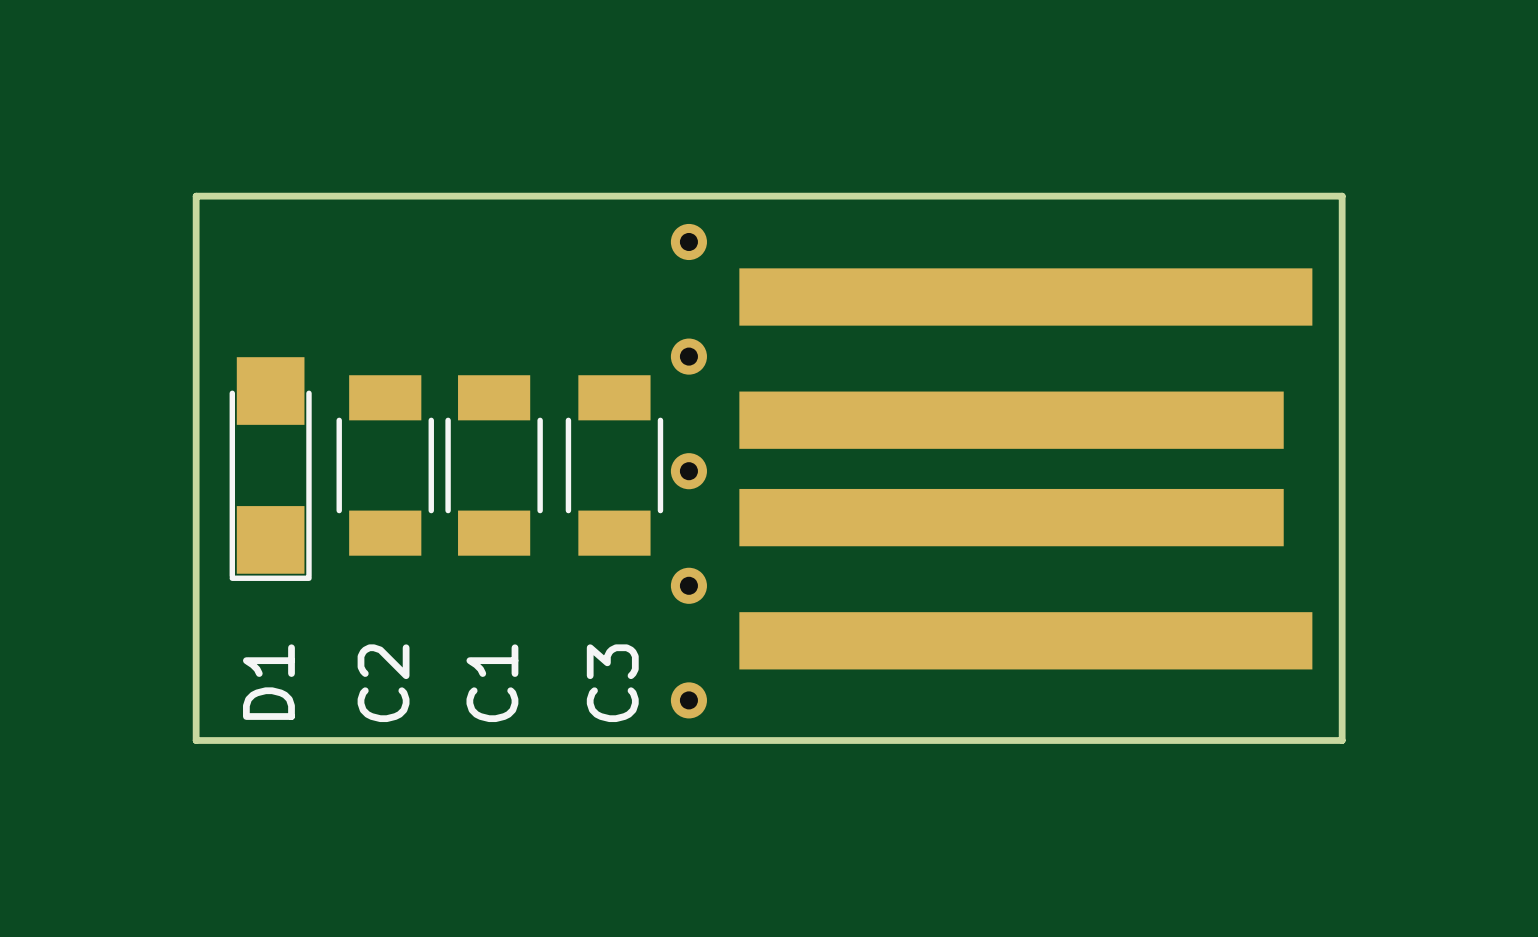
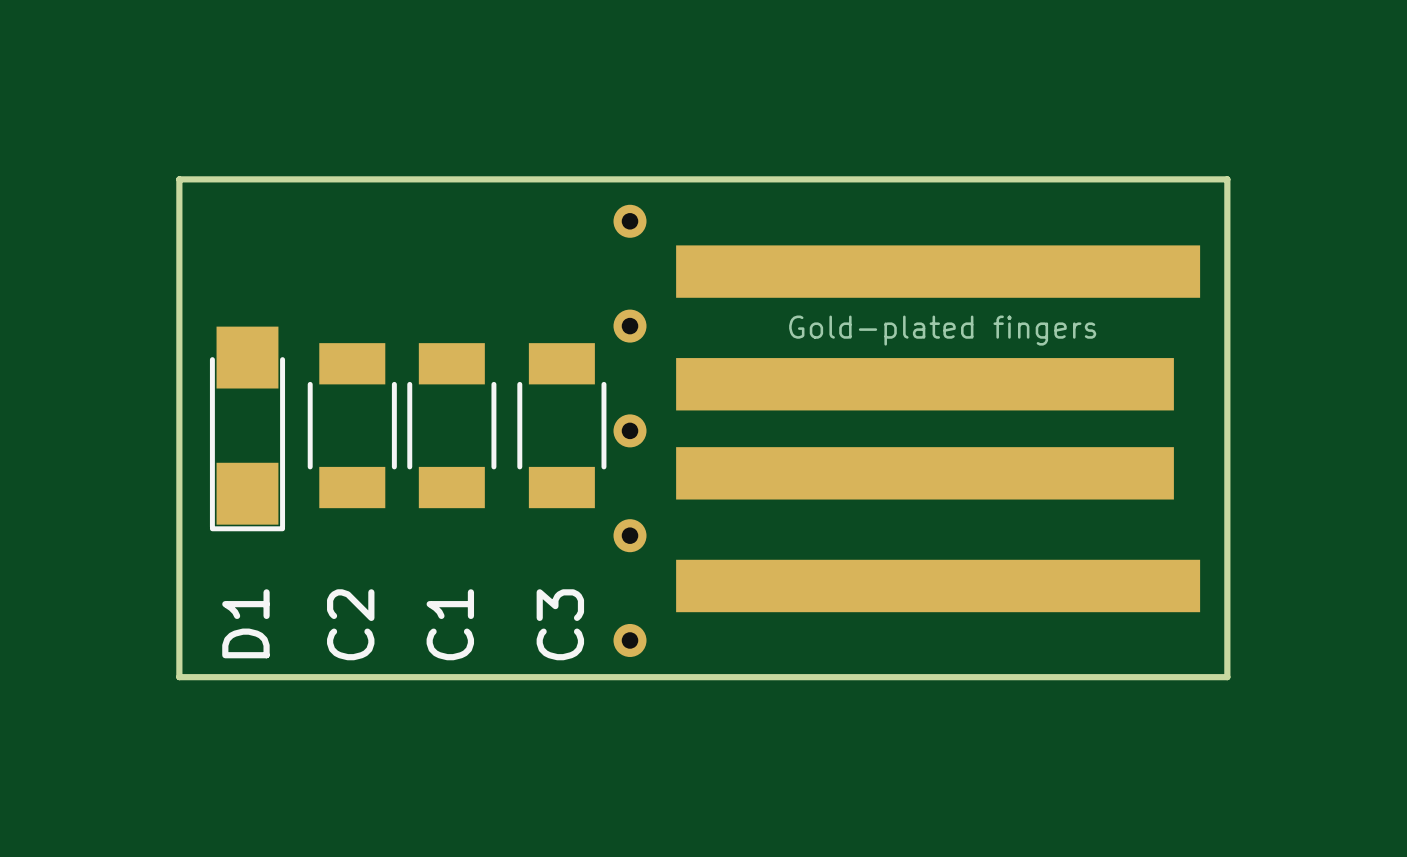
text: none -> Gold-plated fingers (942, 330)

